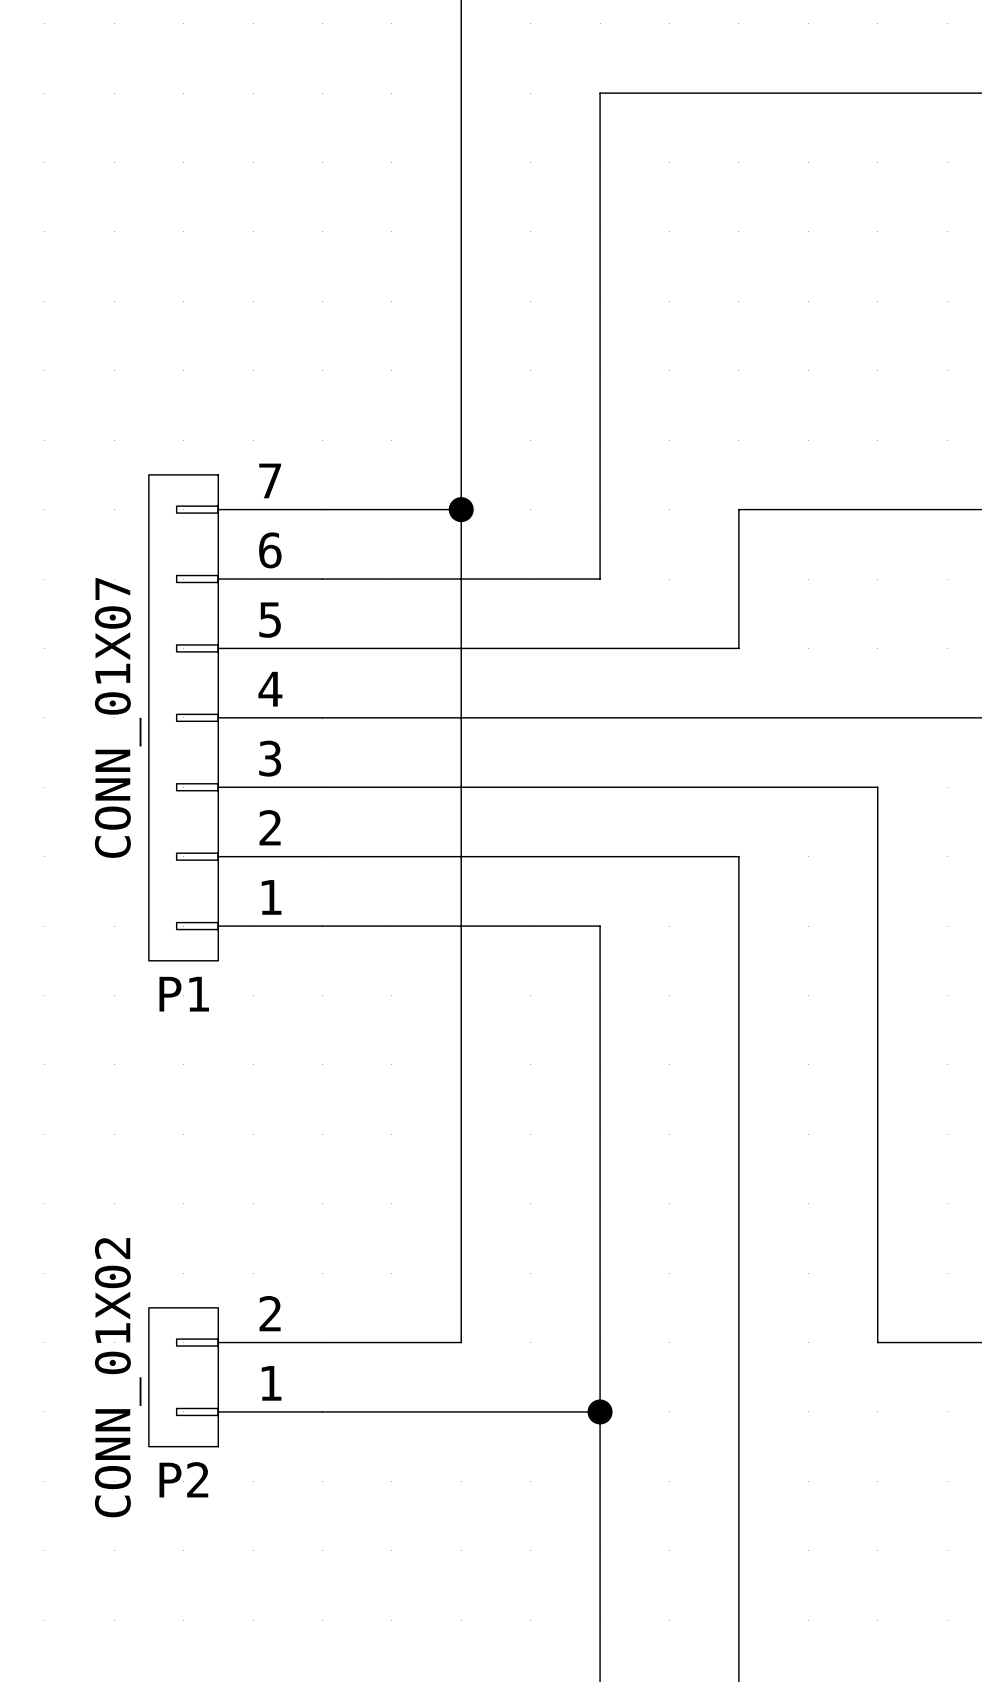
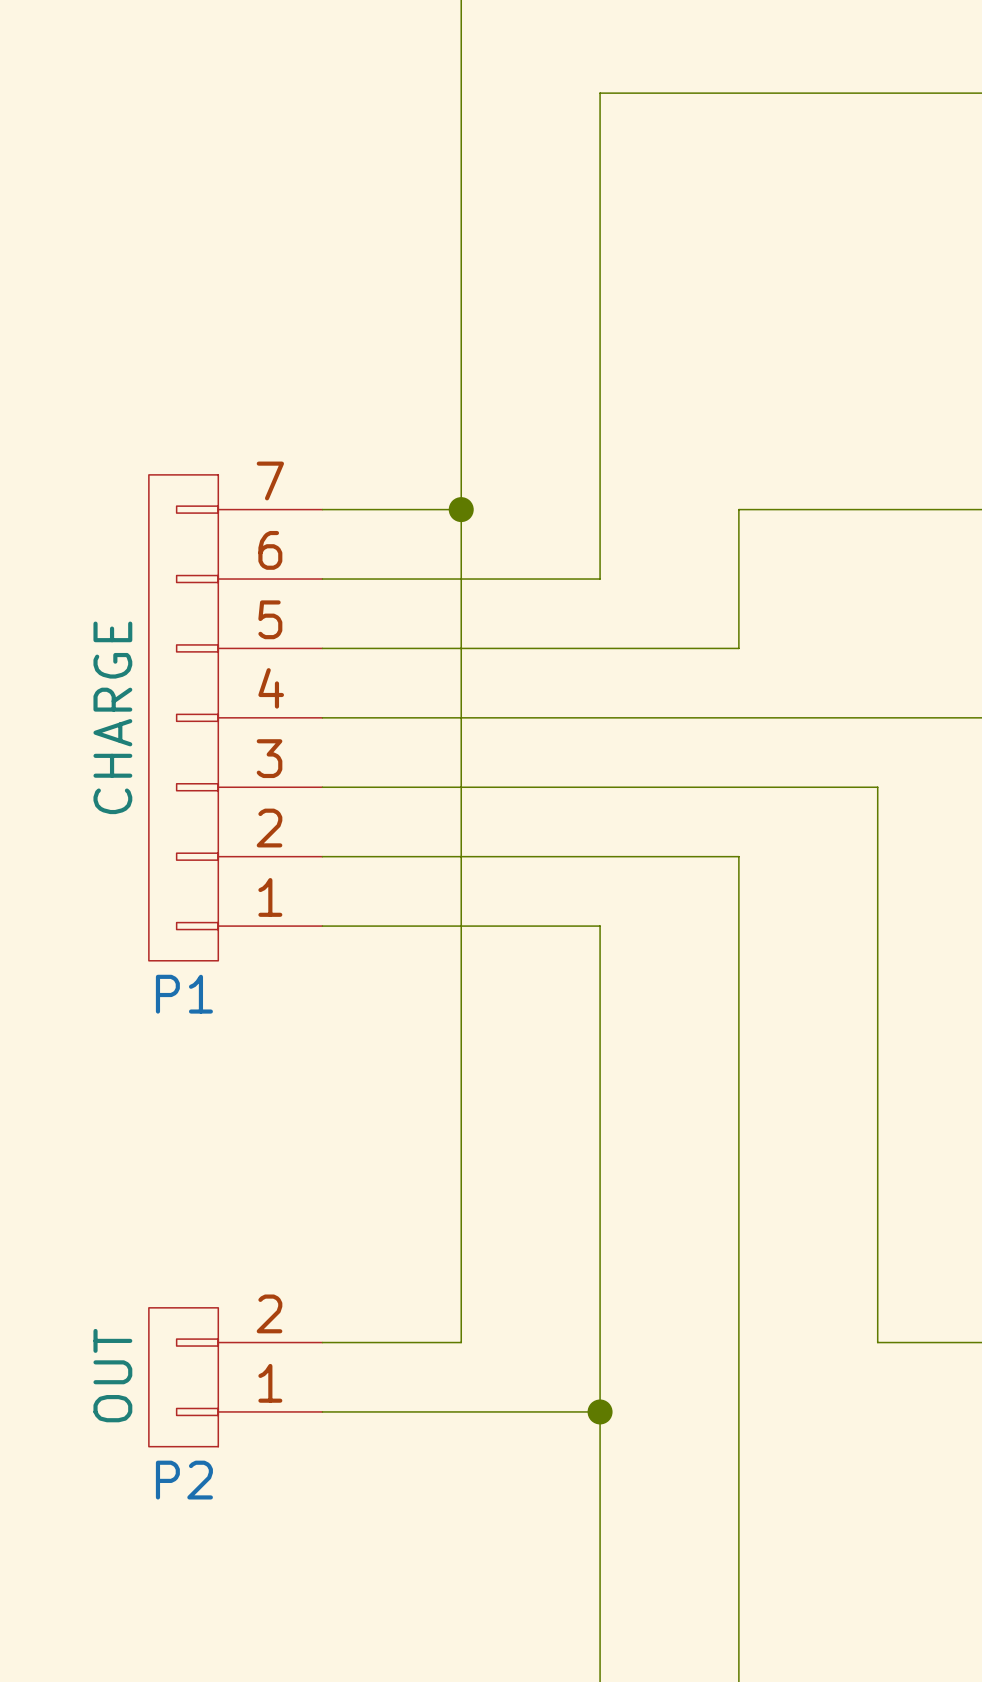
P1 value: CONN_01X07 (118, 718) -> CHARGE (112, 717)
P2 value: CONN_01X02 (118, 1377) -> OUT (112, 1375)

